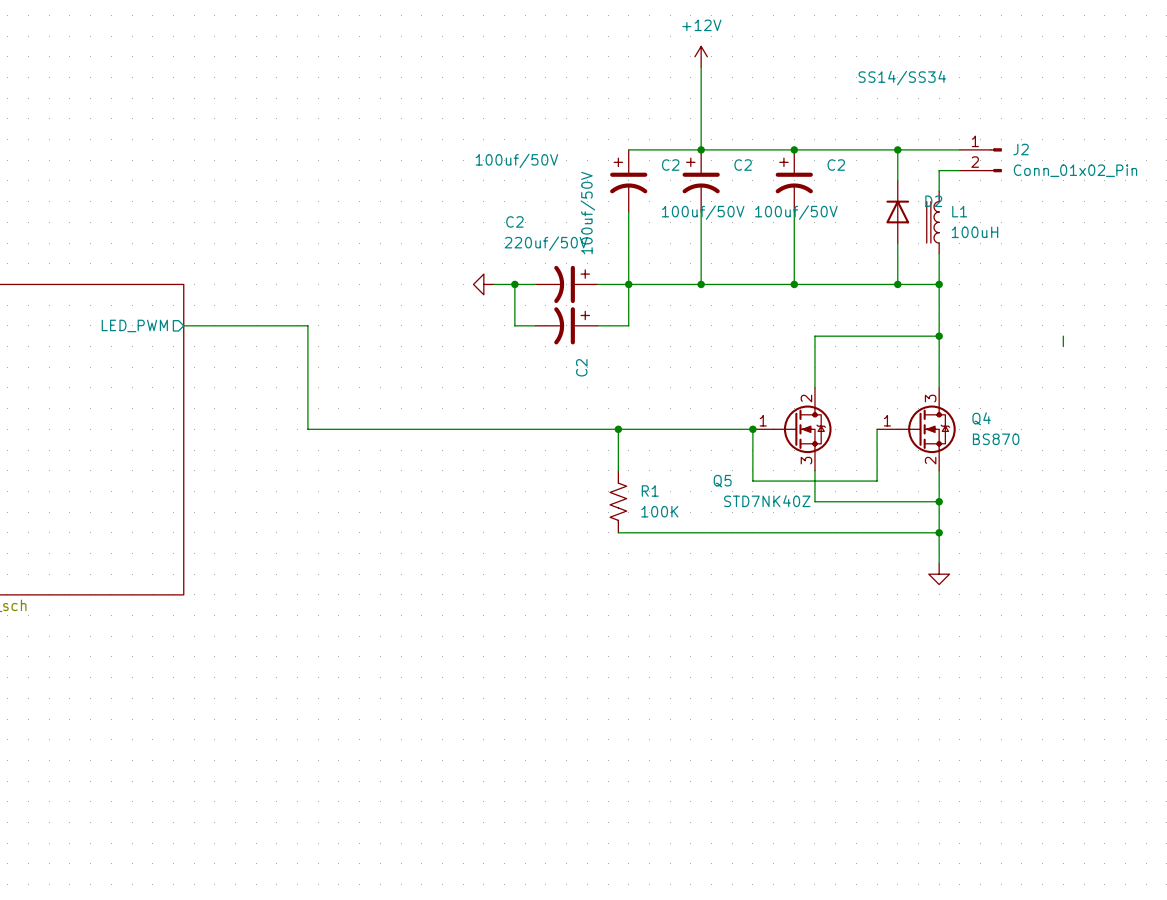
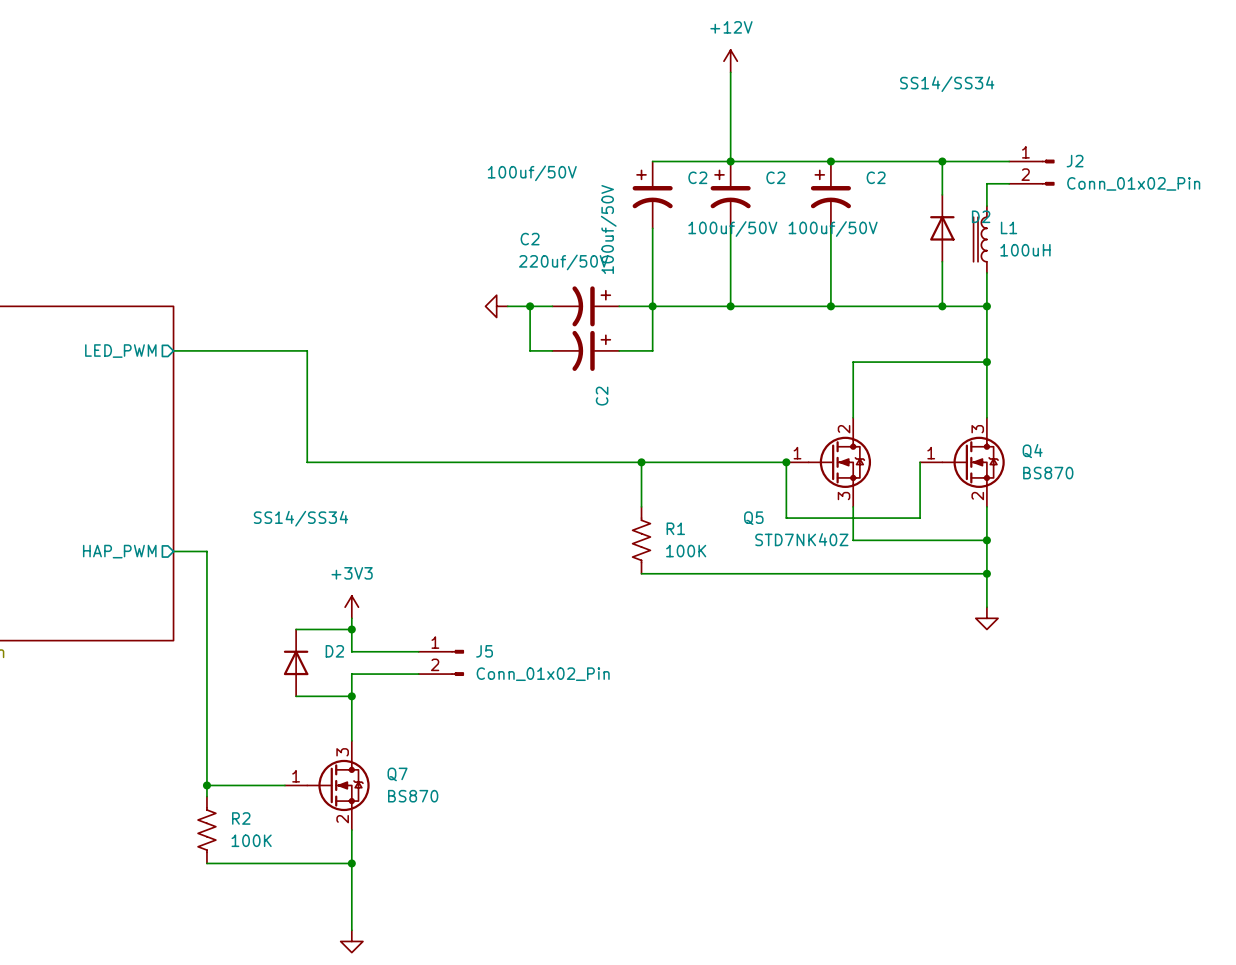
wire: (1063, 336) (1063, 346) -> none
sheet pin: none -> HAP_PWM (119, 551)
wire: none -> (173, 551) (206, 551) (206, 796)
power symbol: none -> +3V3 (351, 607)
wire: none -> (351, 618) (351, 651) (418, 651)
wire: none -> (296, 629) (351, 629)
junction: none -> (351, 629)
D2: none -> SS14/SS34 (296, 662)
J5: none -> Conn_01x02_Pin (441, 662)
wire: none -> (418, 674) (351, 674) (351, 740)
wire: none -> (296, 696) (351, 696)
junction: none -> (351, 696)
wire: none -> (206, 785) (284, 785)
junction: none -> (206, 785)
Q7: none -> BS870 (327, 785)
R2: none -> 100K (206, 830)
wire: none -> (351, 830) (351, 930)
wire: none -> (206, 863) (351, 863)
junction: none -> (351, 863)
power symbol: none -> (351, 941)

